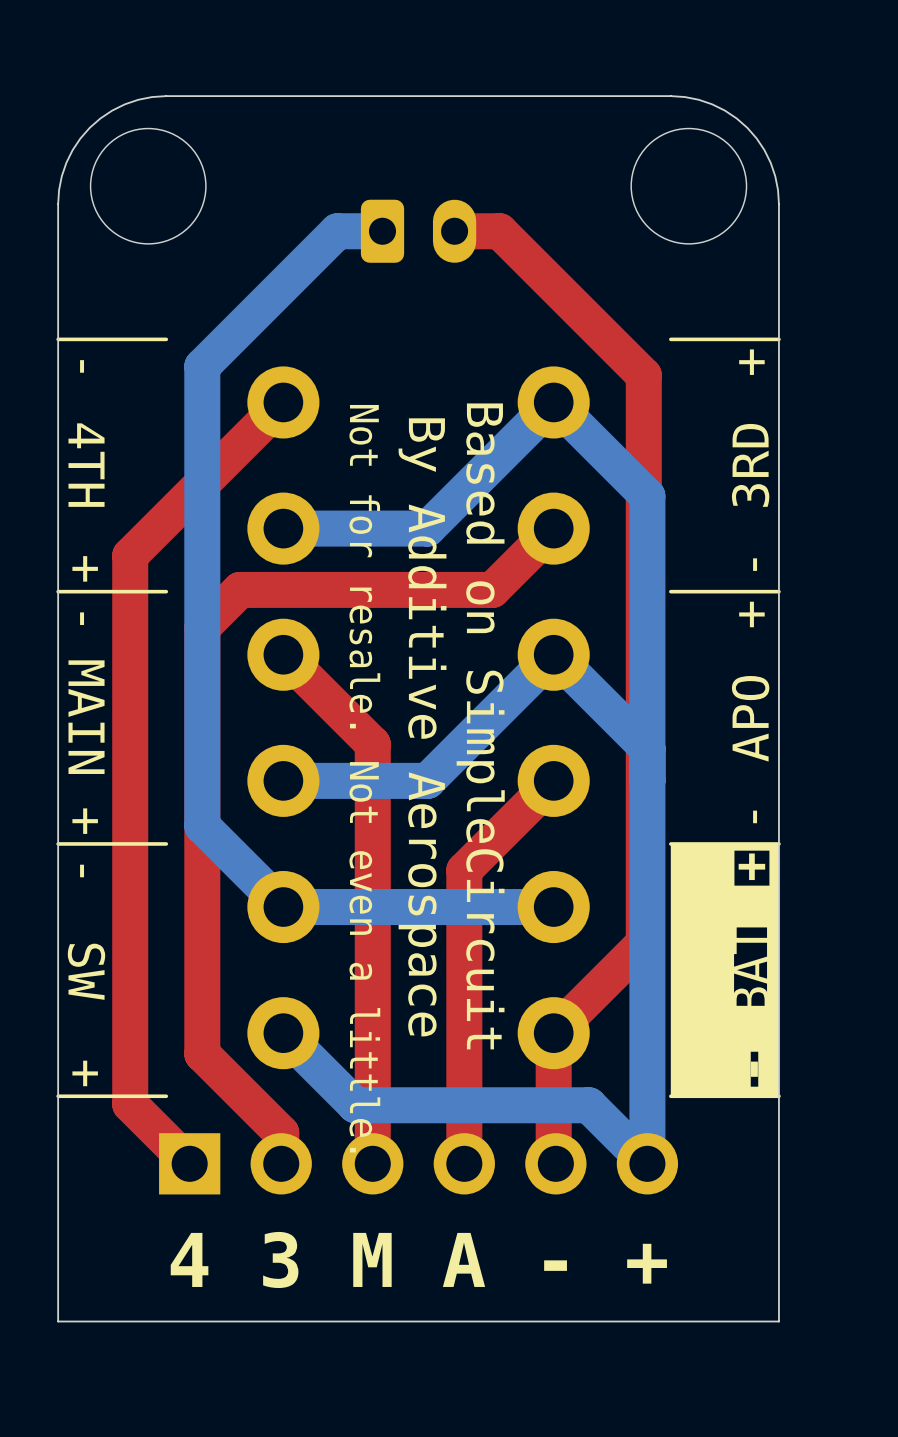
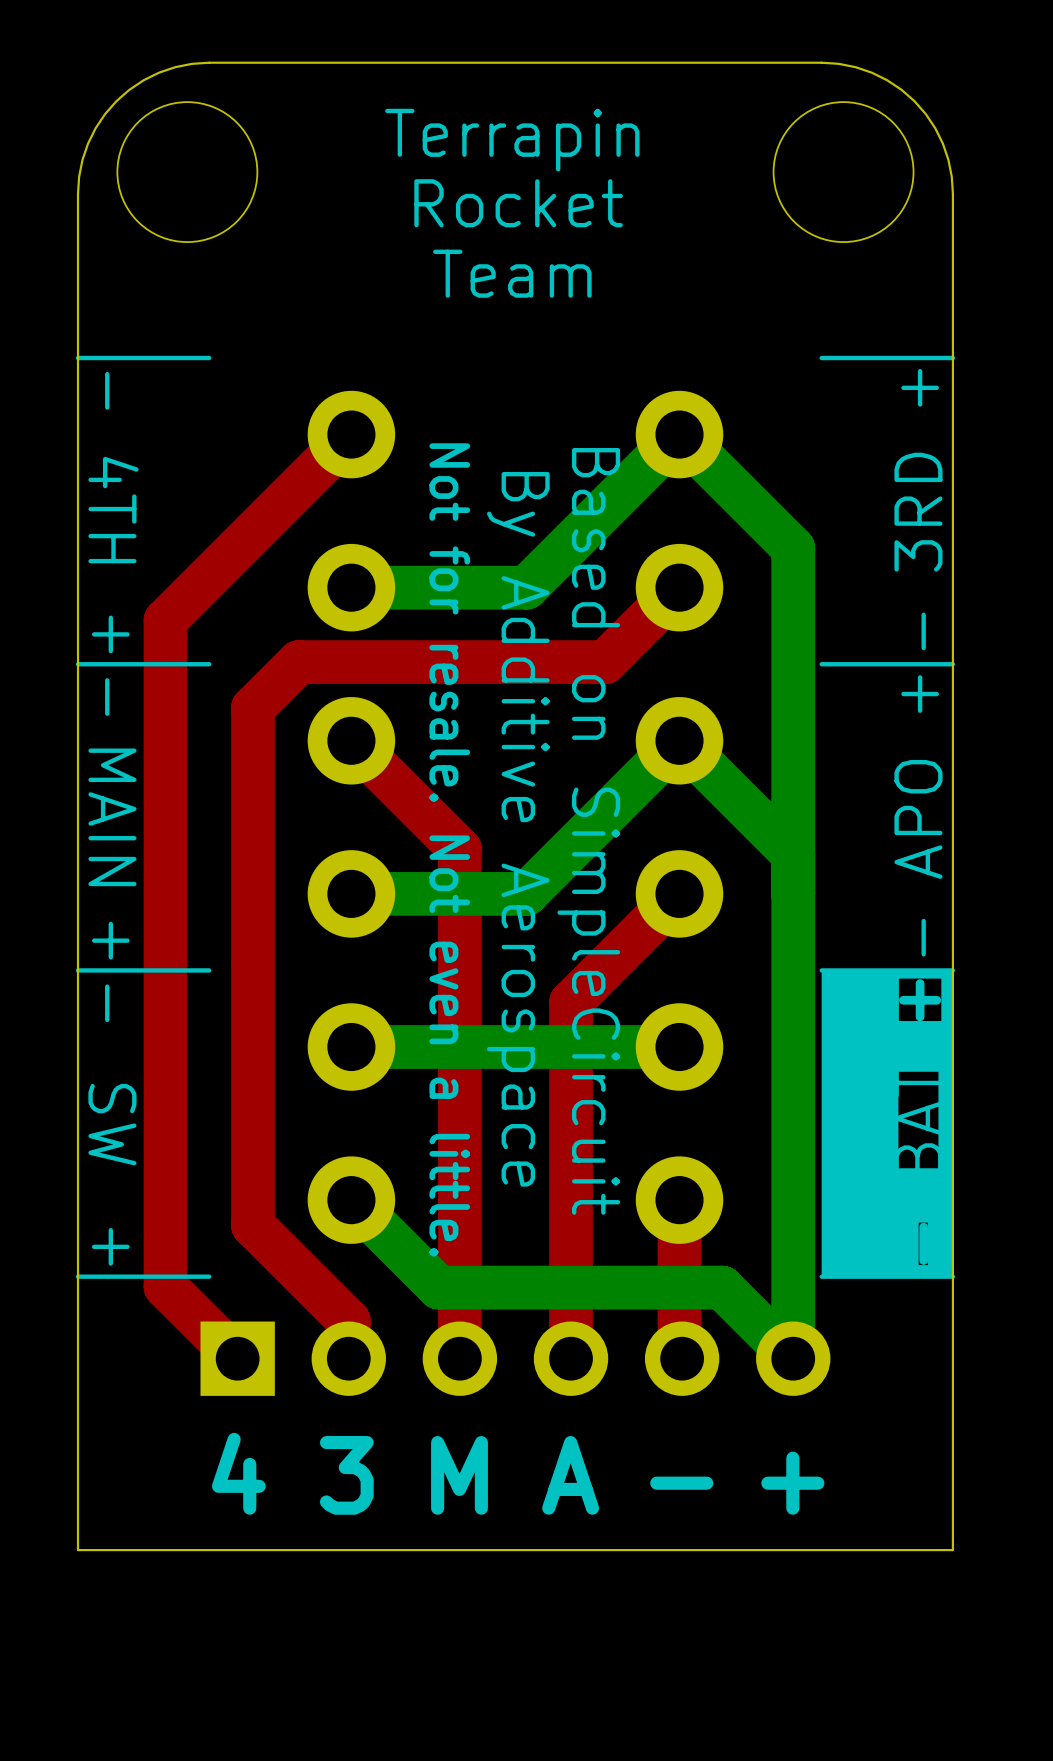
text: none -> Terrapin (512, 140)
text: none -> Rocket (518, 203)
bottom track: (382, 231) (337, 231) (202, 366) (202, 825) (283, 907) -> none
part: (418, 231) -> none
top track: (454, 231) (499, 231) (643, 375) (643, 943) (553, 1033) -> none
text: none -> Team (512, 273)

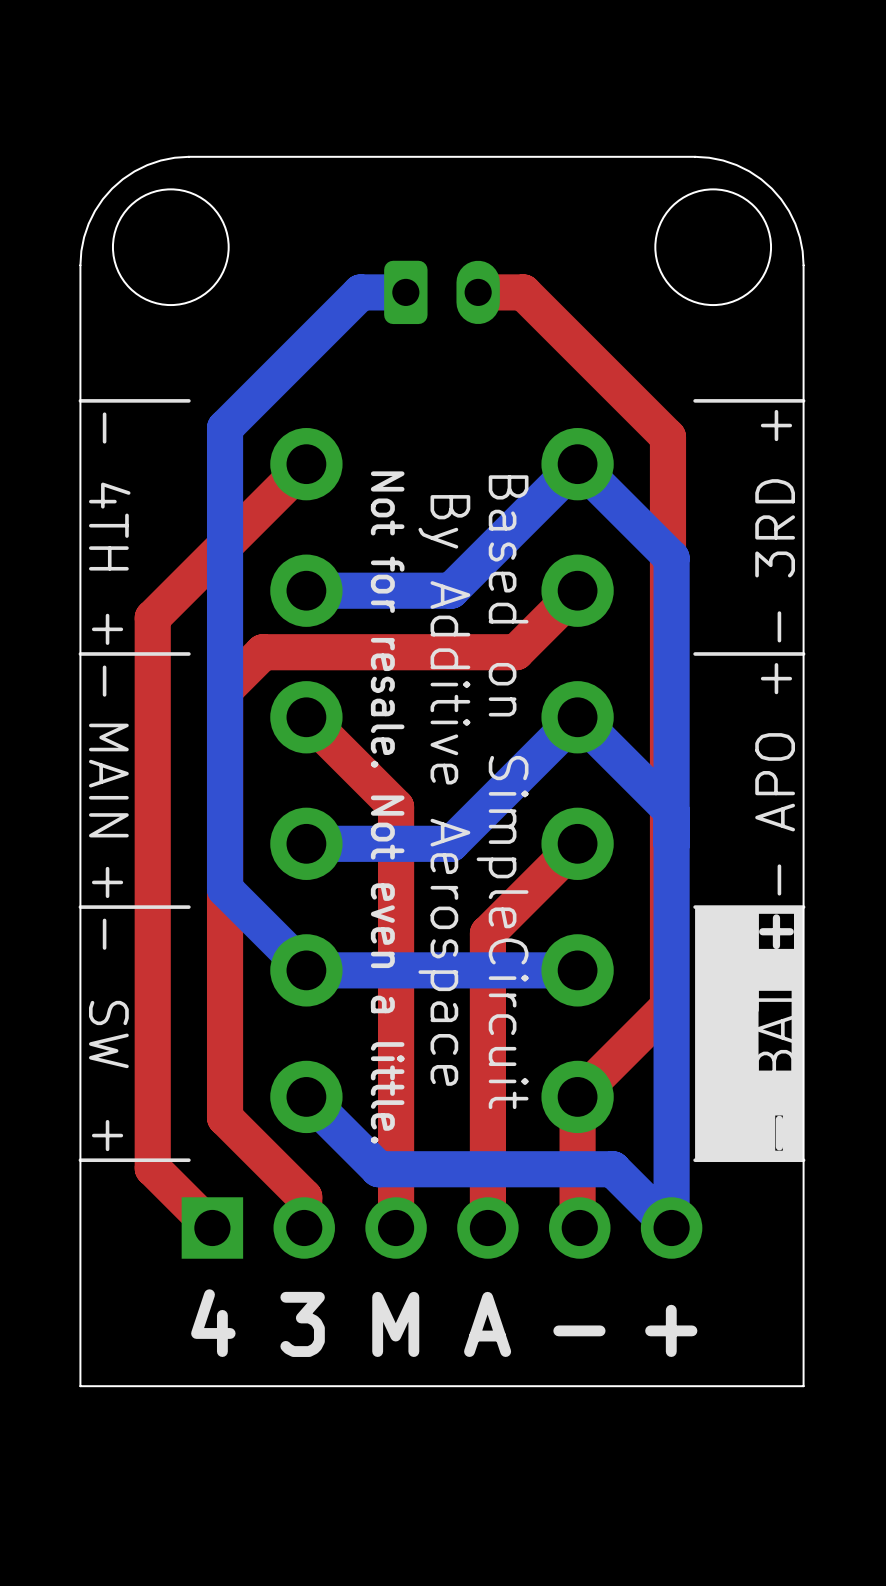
text: Terrapin (512, 140) -> none
text: Rocket (518, 203) -> none
bottom track: none -> (405, 292) (360, 292) (225, 428) (225, 889) (306, 970)
part: none -> (442, 292)
top track: none -> (478, 292) (523, 292) (667, 437) (667, 1006) (577, 1096)
text: Team (512, 273) -> none

